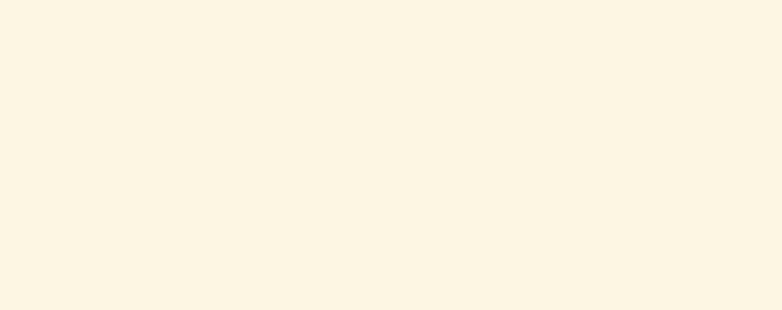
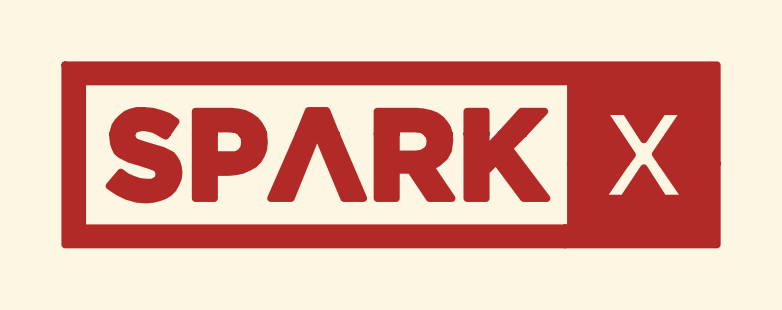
part: none -> (391, 154)

